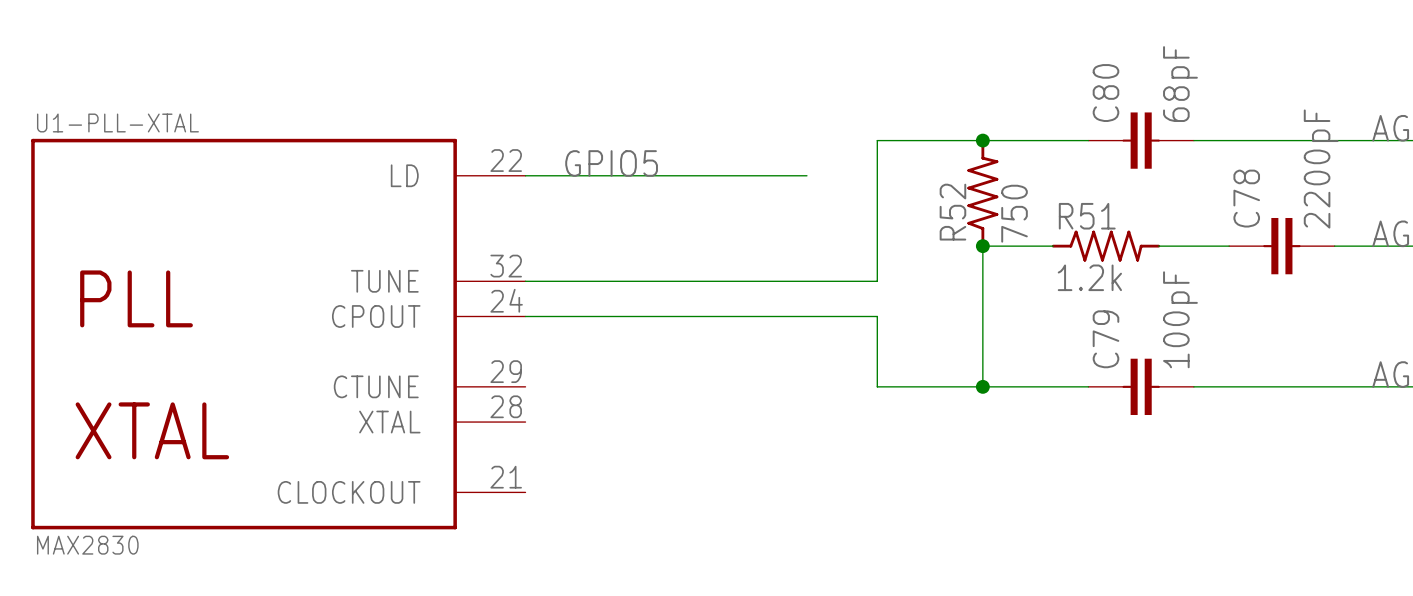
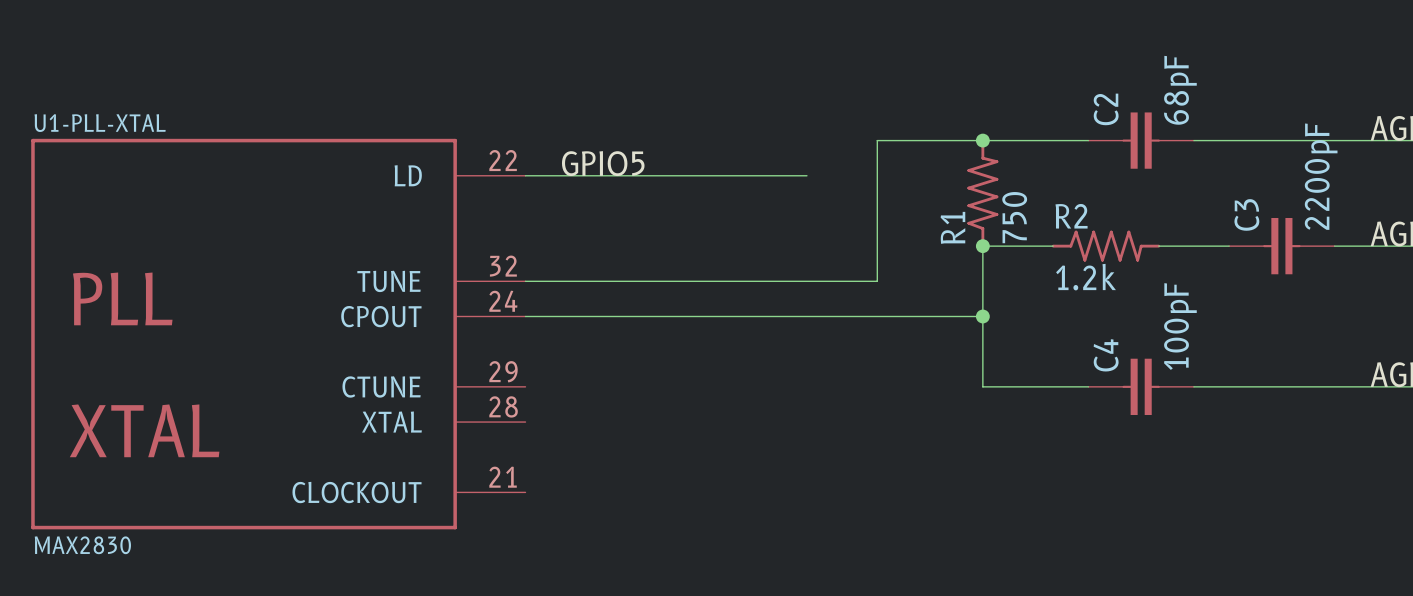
C80 name: C80 (1105, 93) -> C2 (1106, 109)
C78 name: C78 (1246, 198) -> C3 (1246, 214)
R52 name: R52 (952, 212) -> R1 (952, 227)
R51 name: R51 (1087, 216) -> R2 (1071, 216)
wire: (877, 316) (877, 386) (982, 386) -> (877, 316) (982, 316)
C79 name: C79 (1105, 339) -> C4 (1106, 355)
junction position: (982, 386) -> (982, 316)

